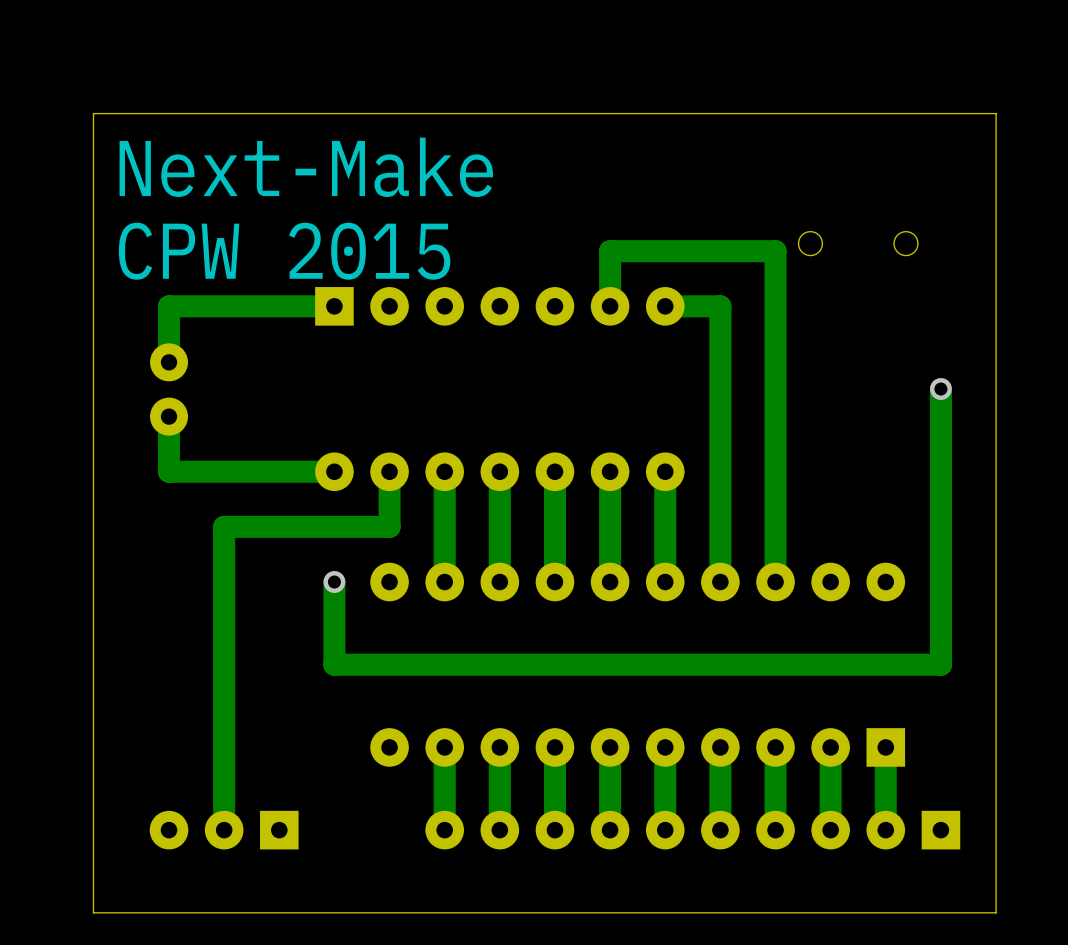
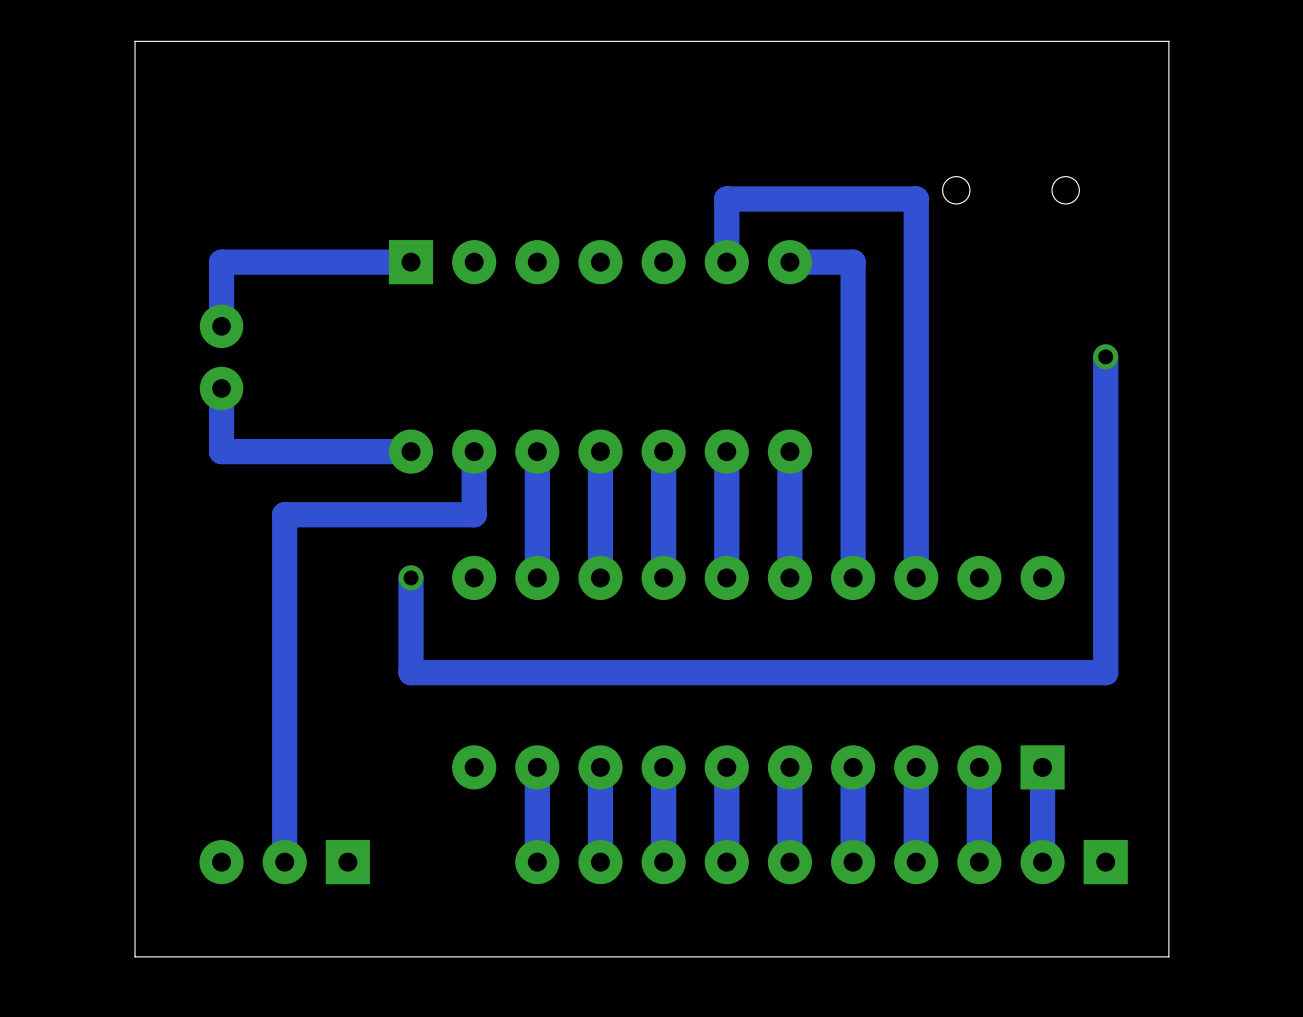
text: Next-Make (306, 167) -> none
text: CPW 2015 (284, 251) -> none

